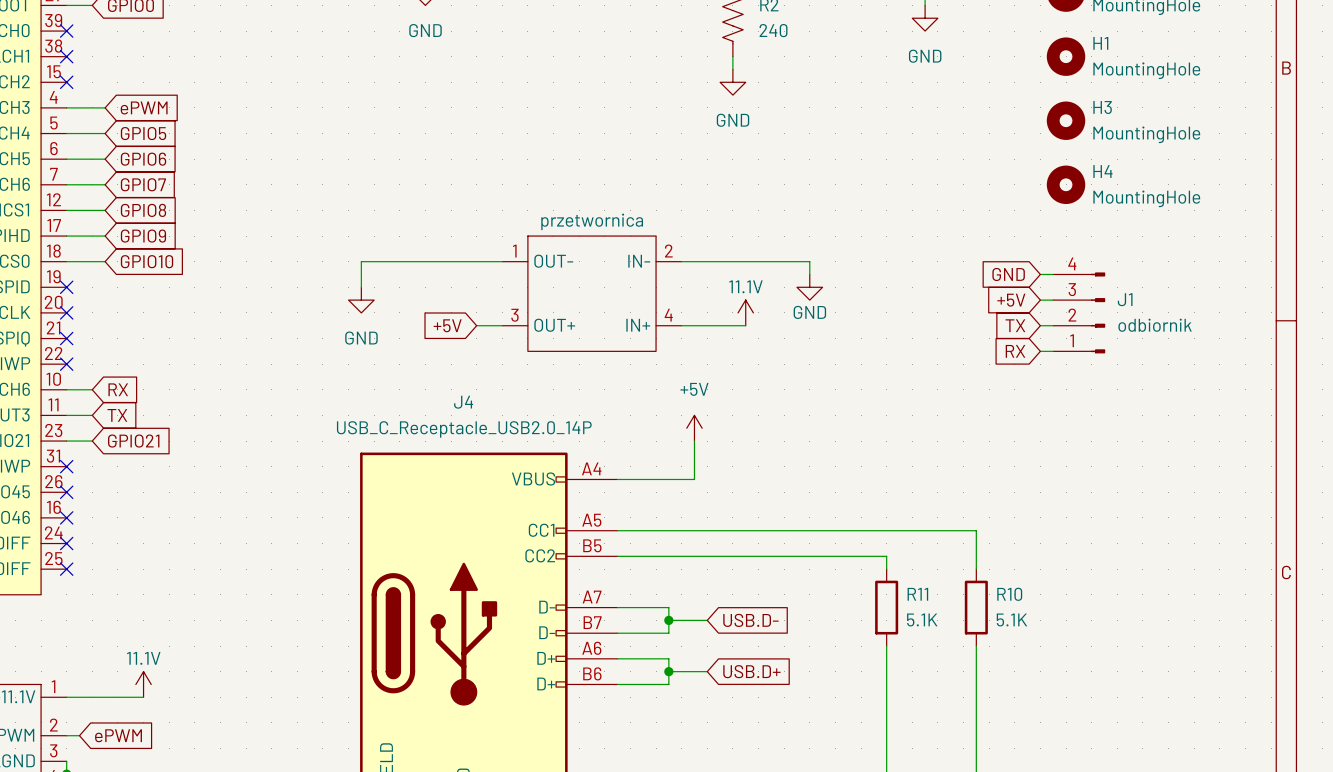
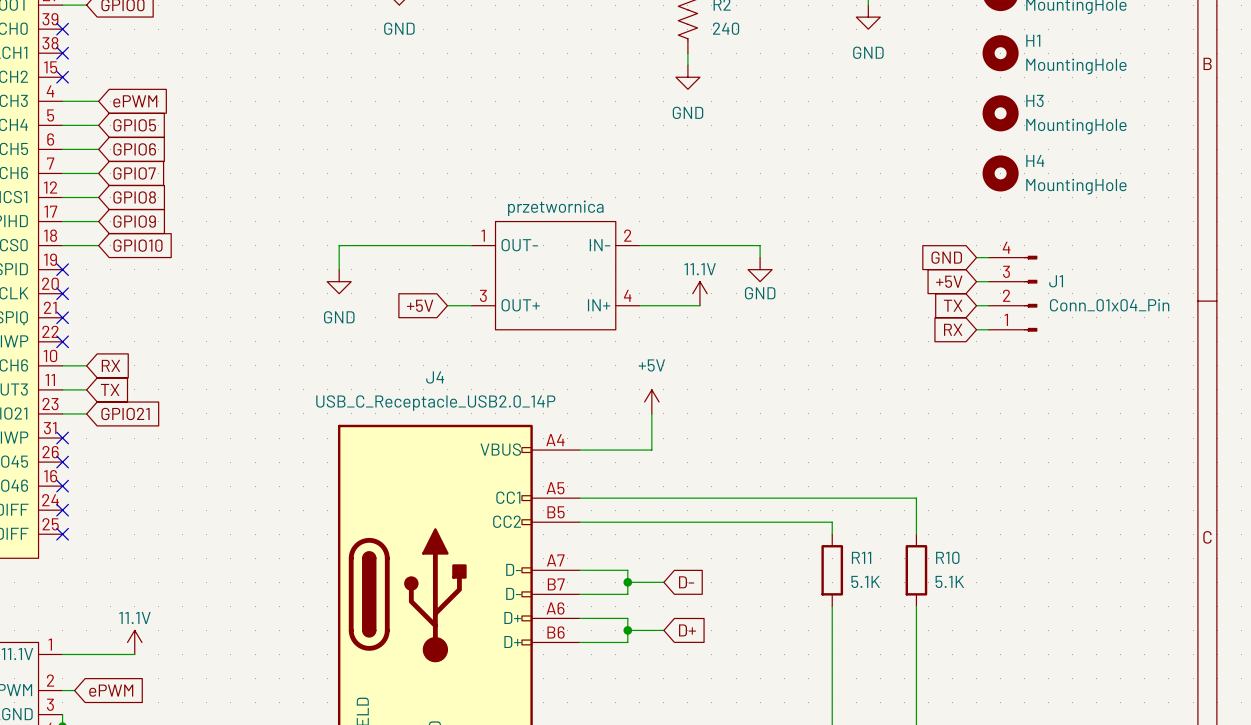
J1 value: odbiornik (1155, 325) -> Conn_01x04_Pin (1109, 305)
global label: USB.D- (750, 620) -> D- (686, 582)
global label: USB.D+ (751, 671) -> D+ (687, 630)

